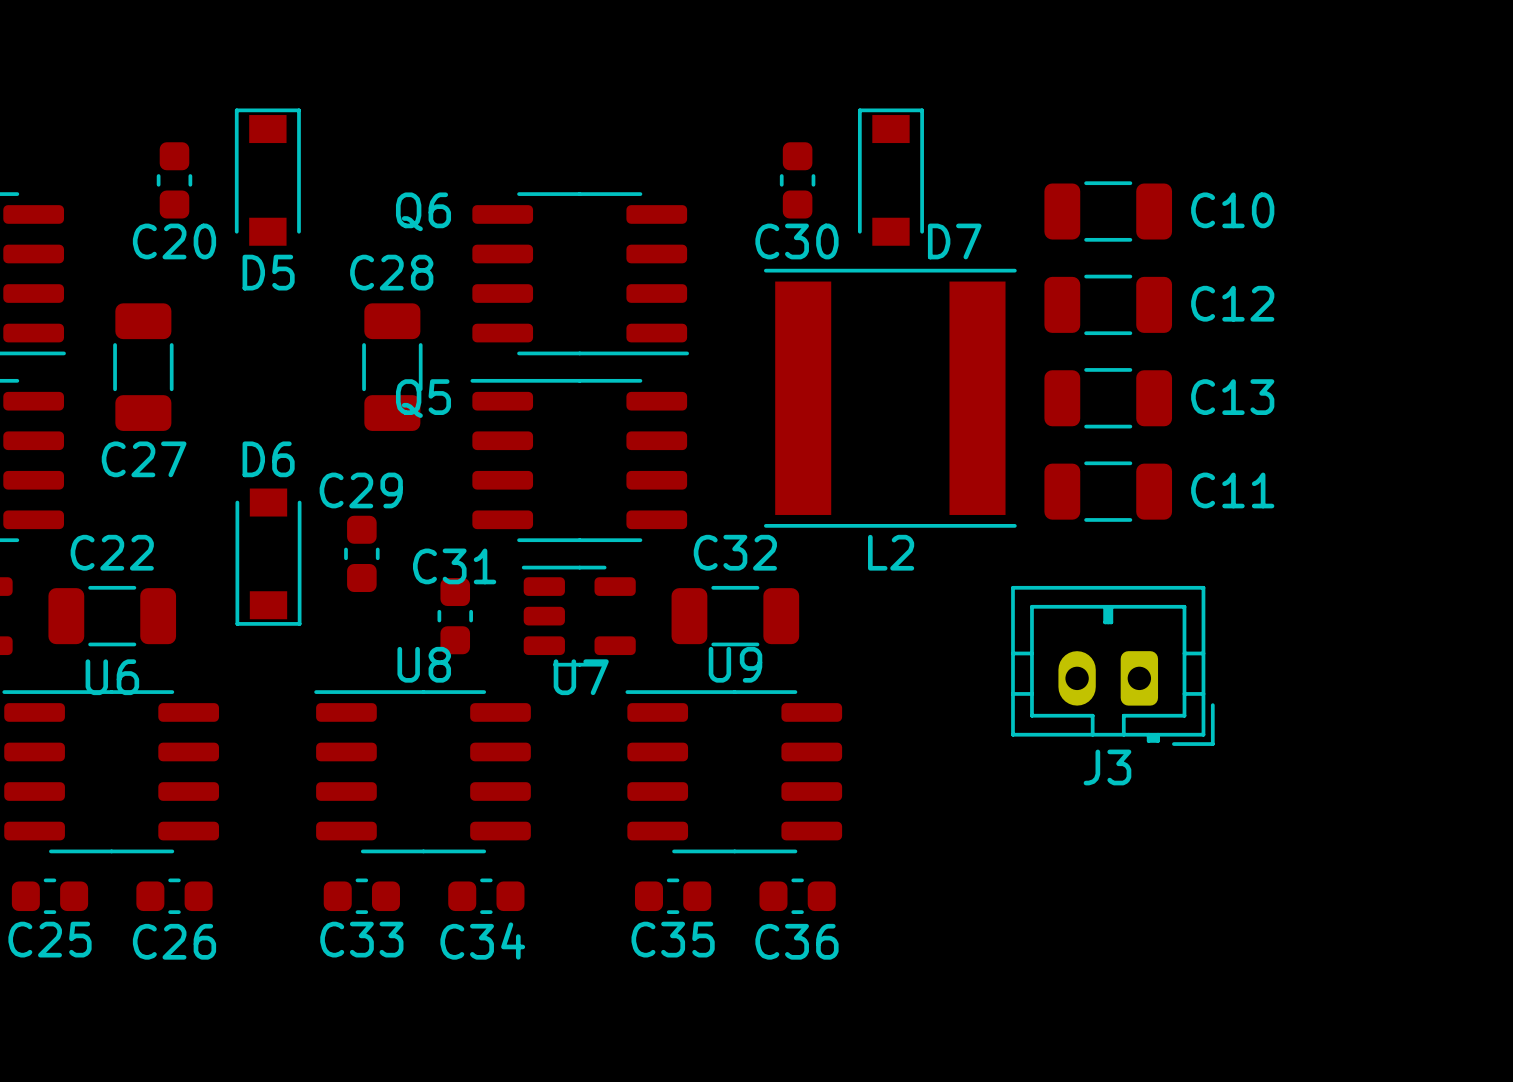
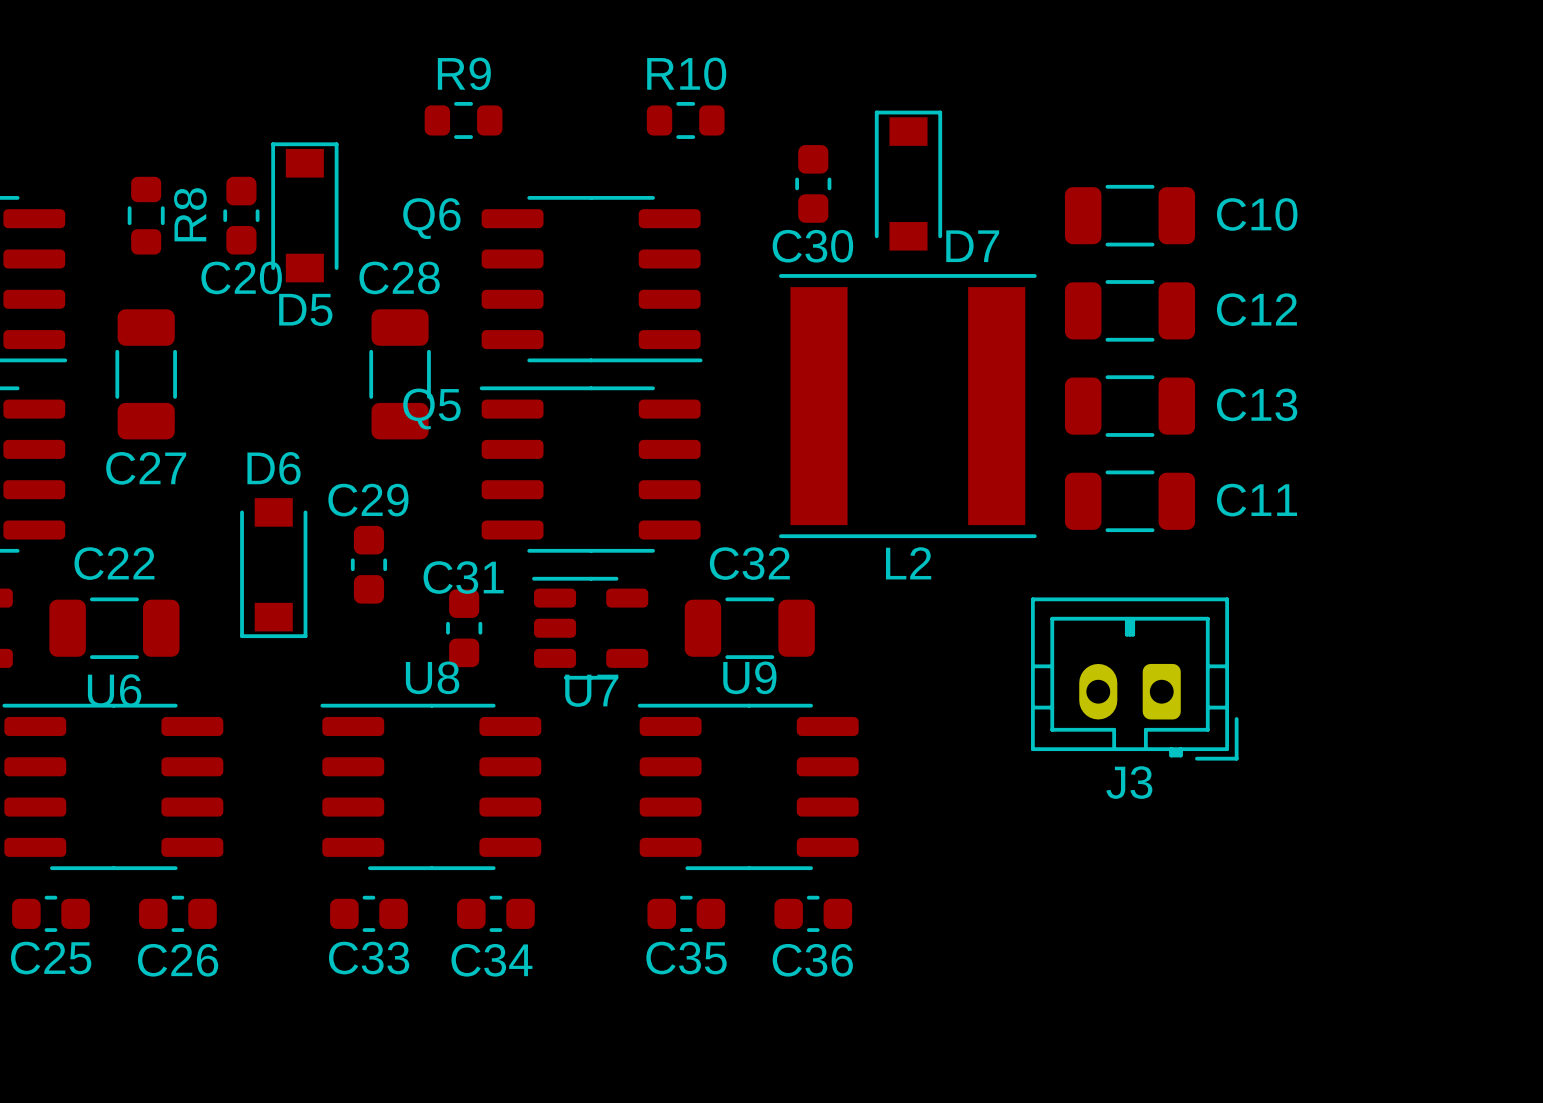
R9: none -> (463, 120)
R10: none -> (685, 120)
D5 position: (267, 177) -> (304, 212)
C20 position: (174, 180) -> (241, 215)
R8: none -> (146, 215)

